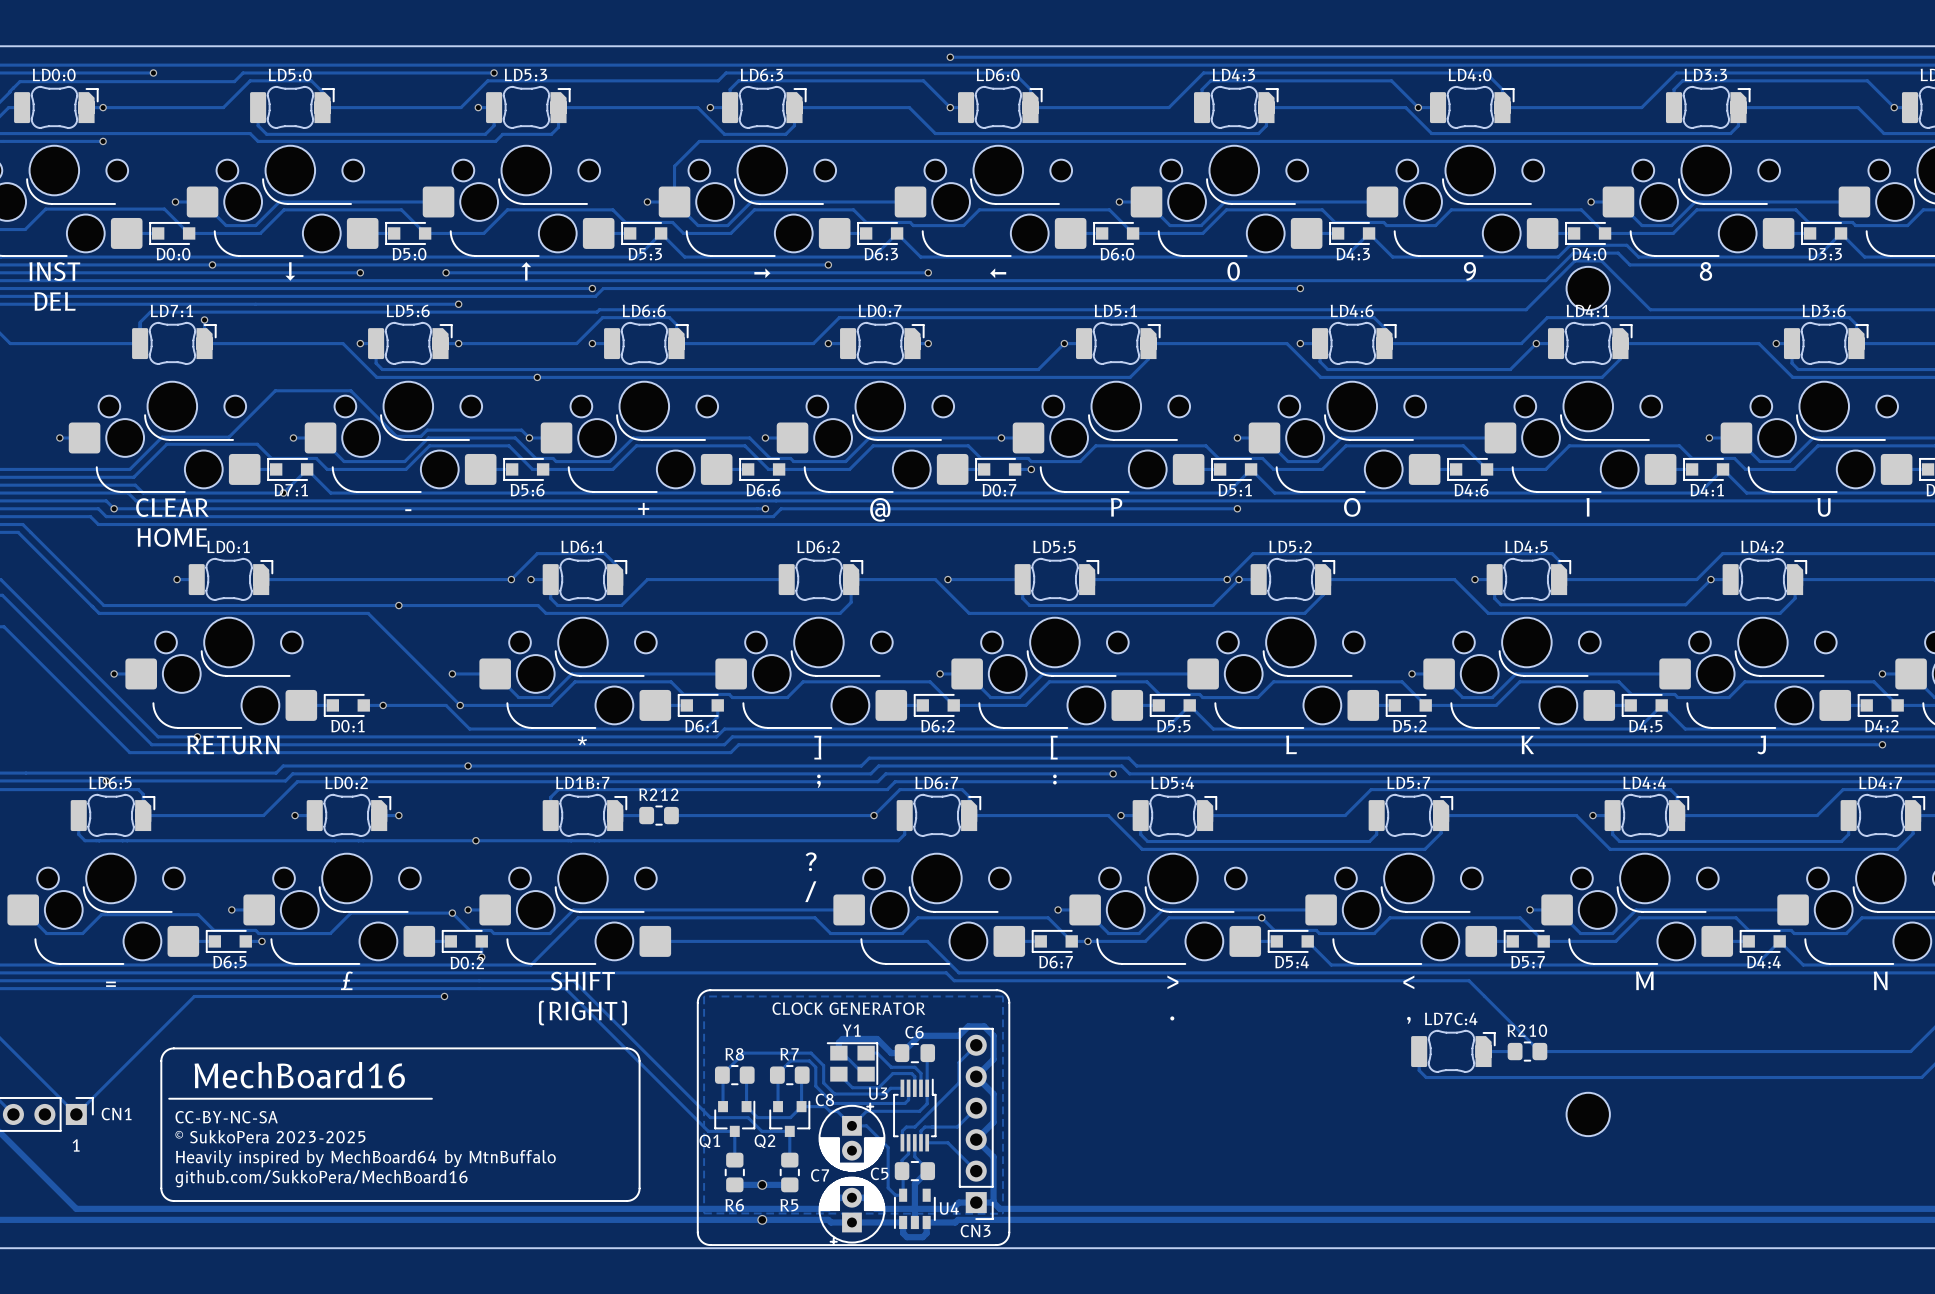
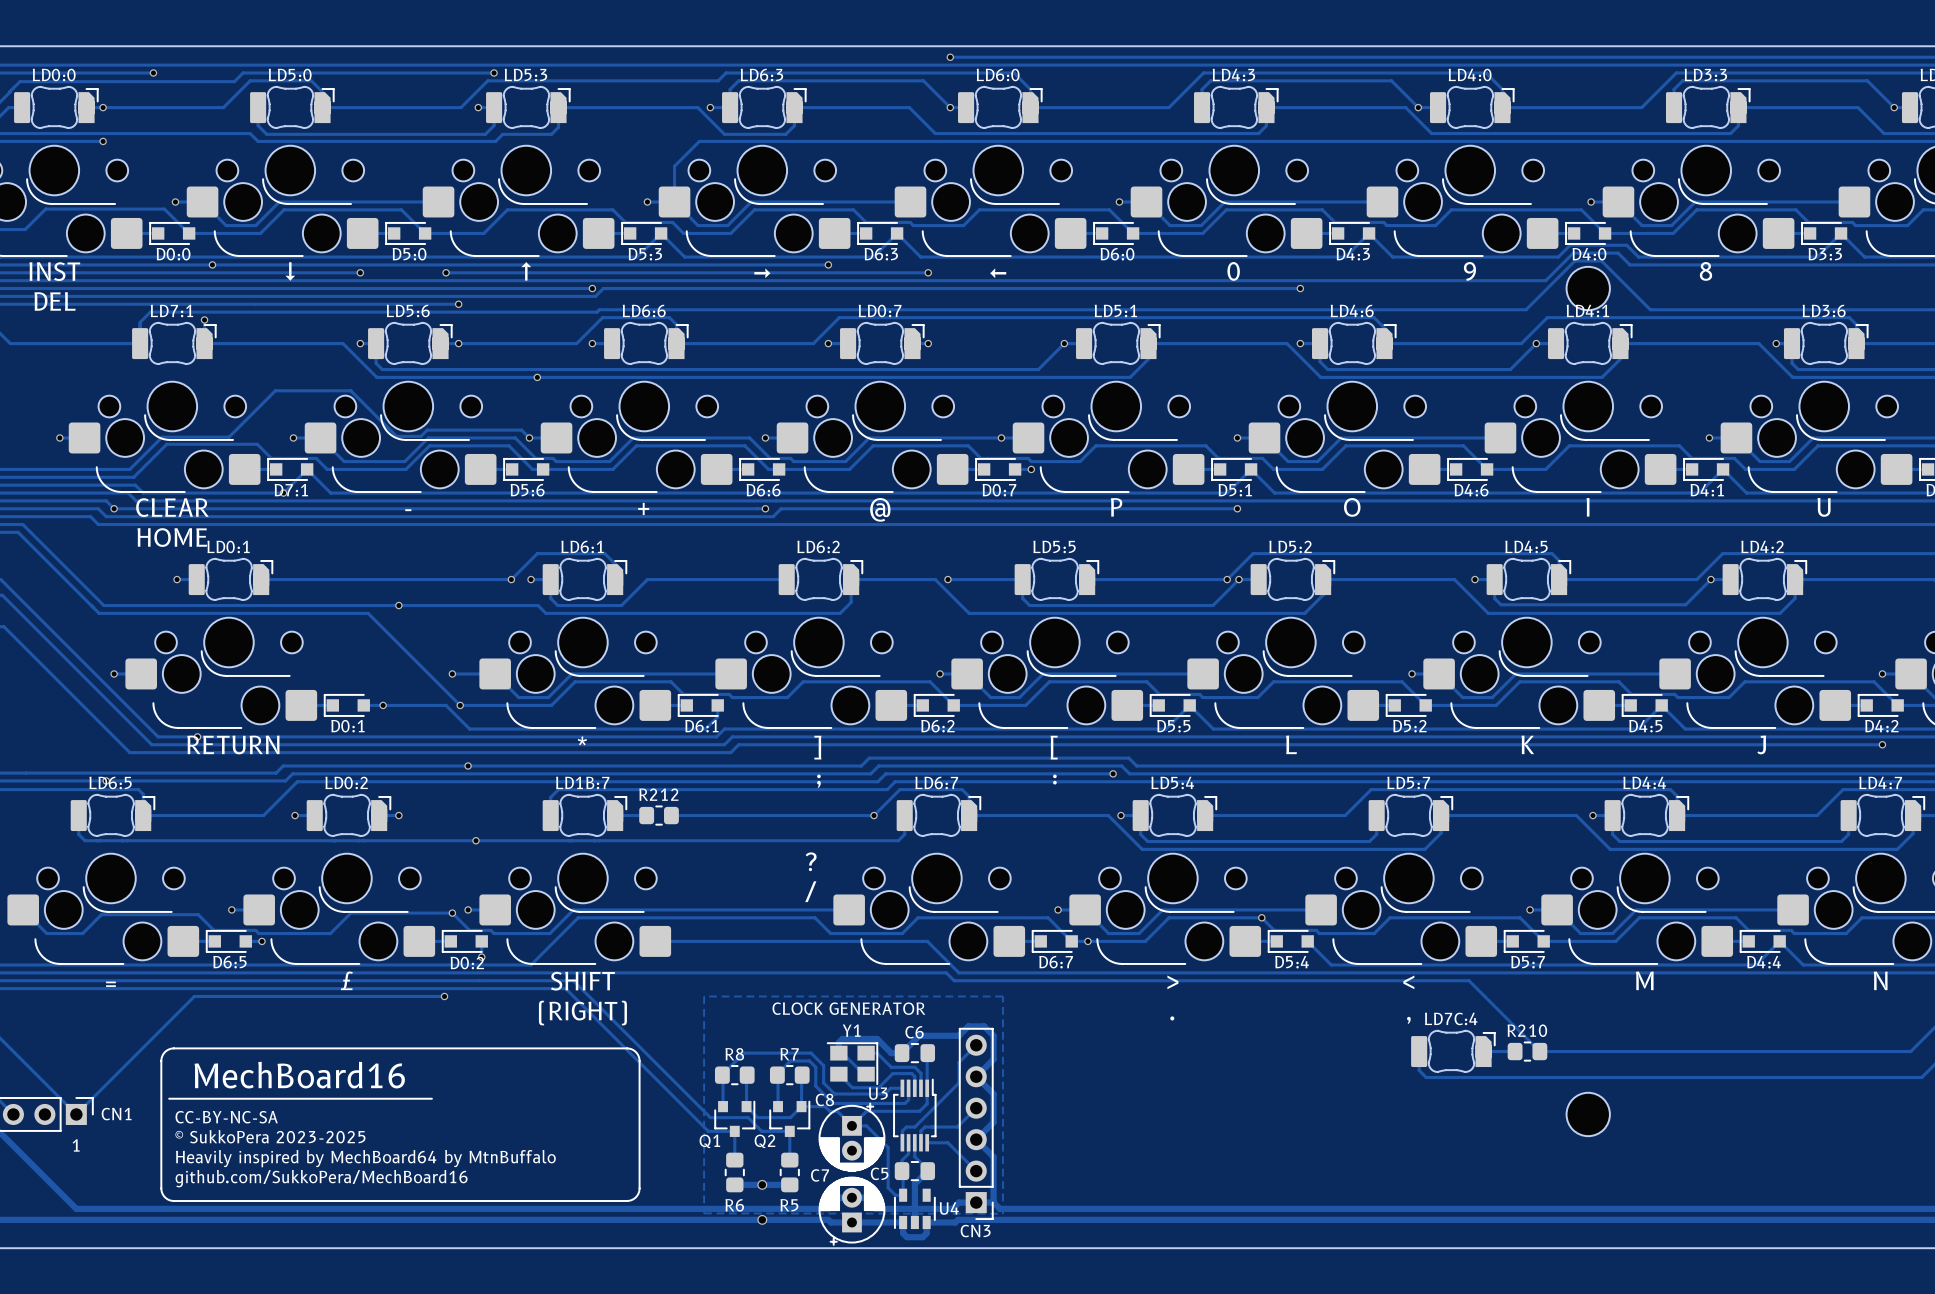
line: (996, 990) (710, 990) (702, 992) (697, 1002) (697, 1232) (700, 1240) (710, 1245) (996, 1245) (1004, 1242) (1009, 1232) (1009, 1002) (1005, 993) (996, 990) -> none

